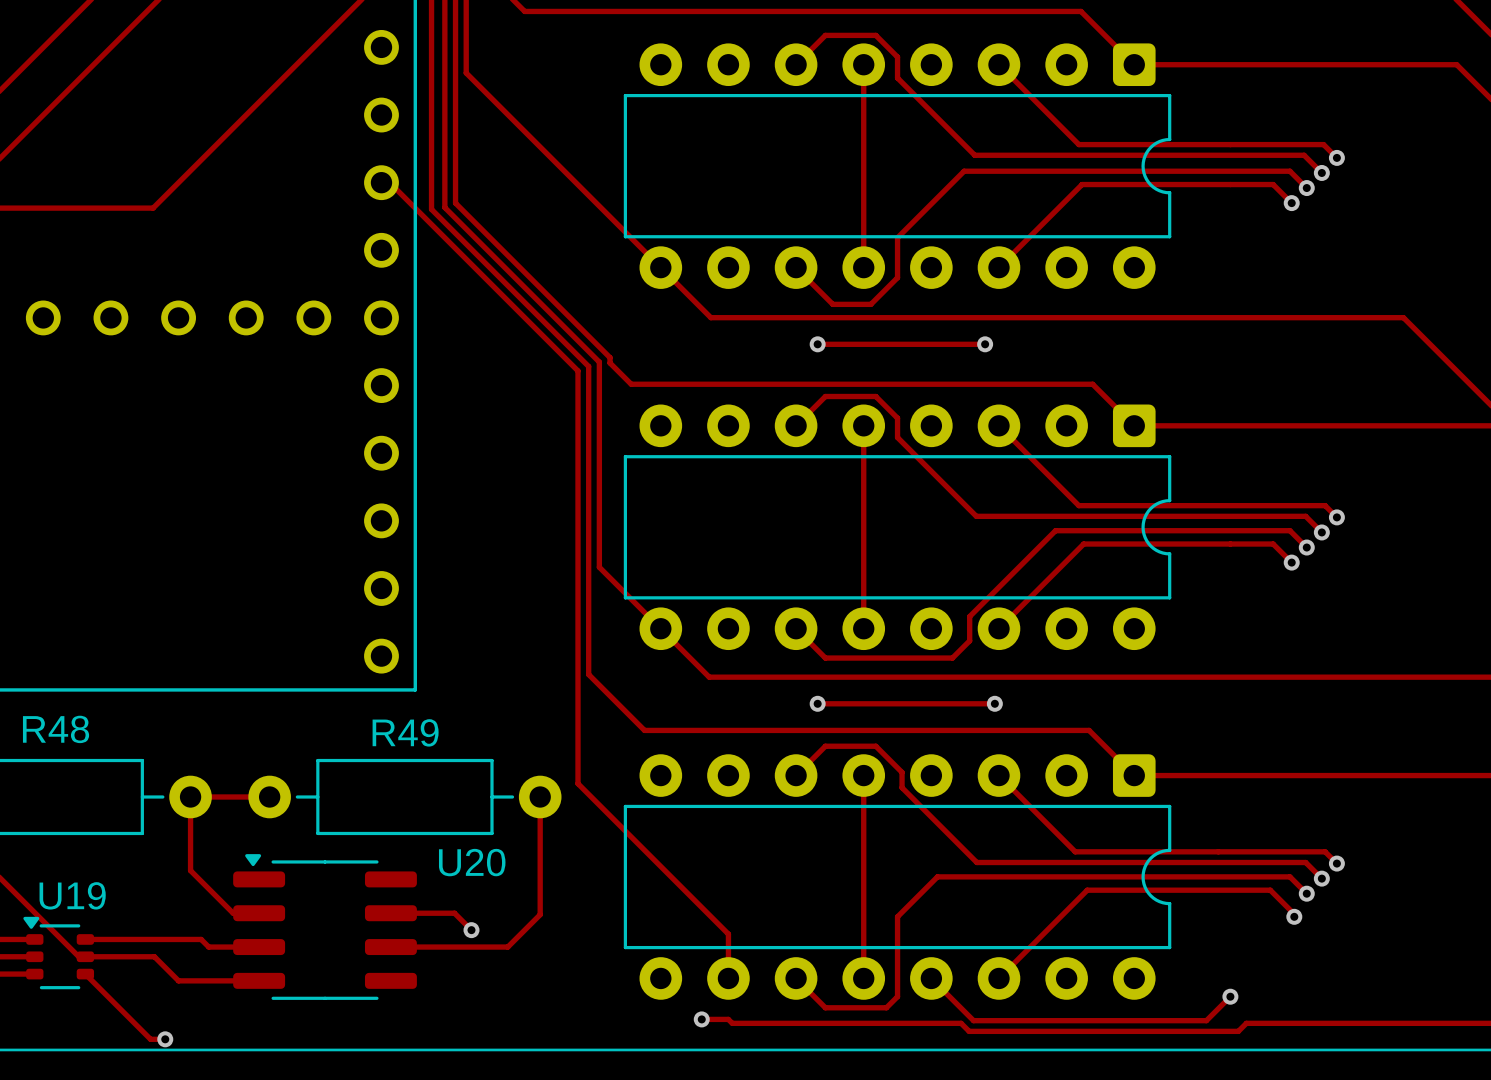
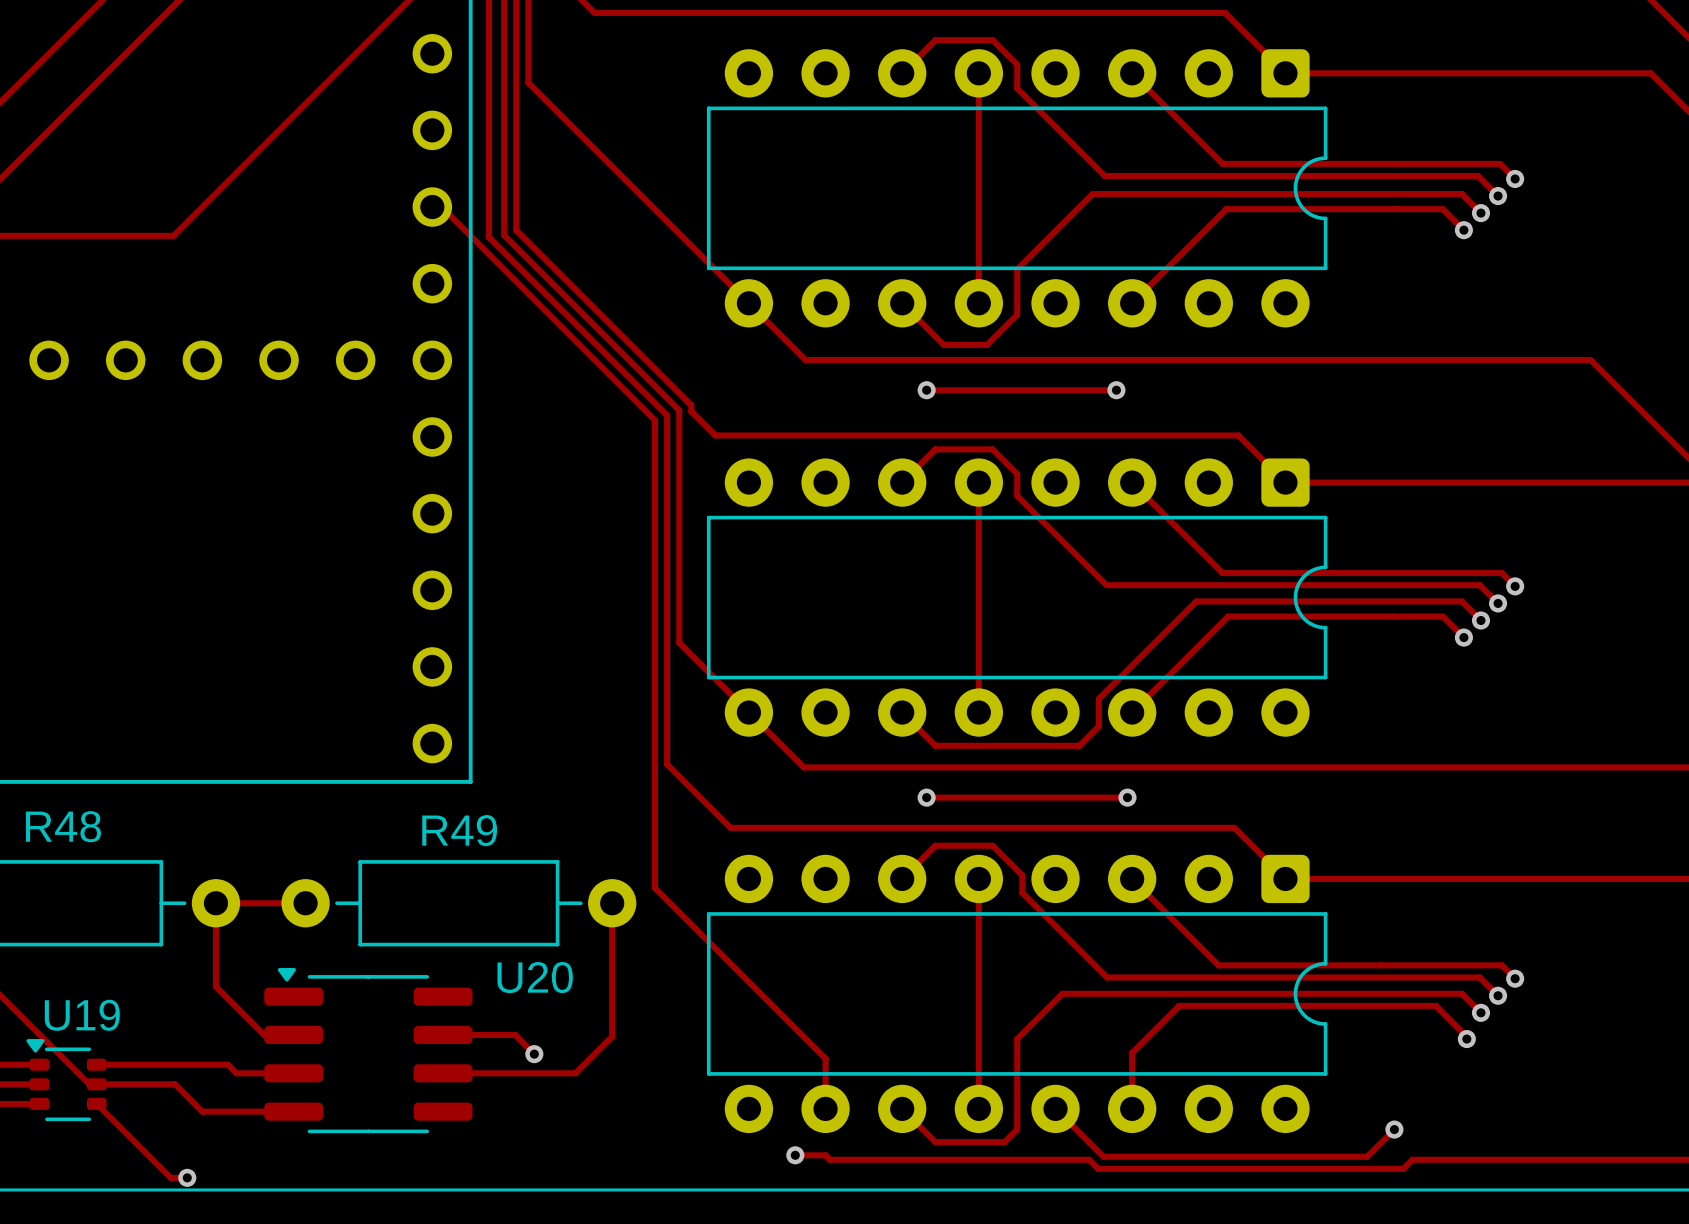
track: (1294, 916) (1294, 914) (1270, 890) (1087, 890) (999, 978) -> (1466, 1036) (1435, 1005) (1179, 1005) (1132, 1052) (1132, 1108)

